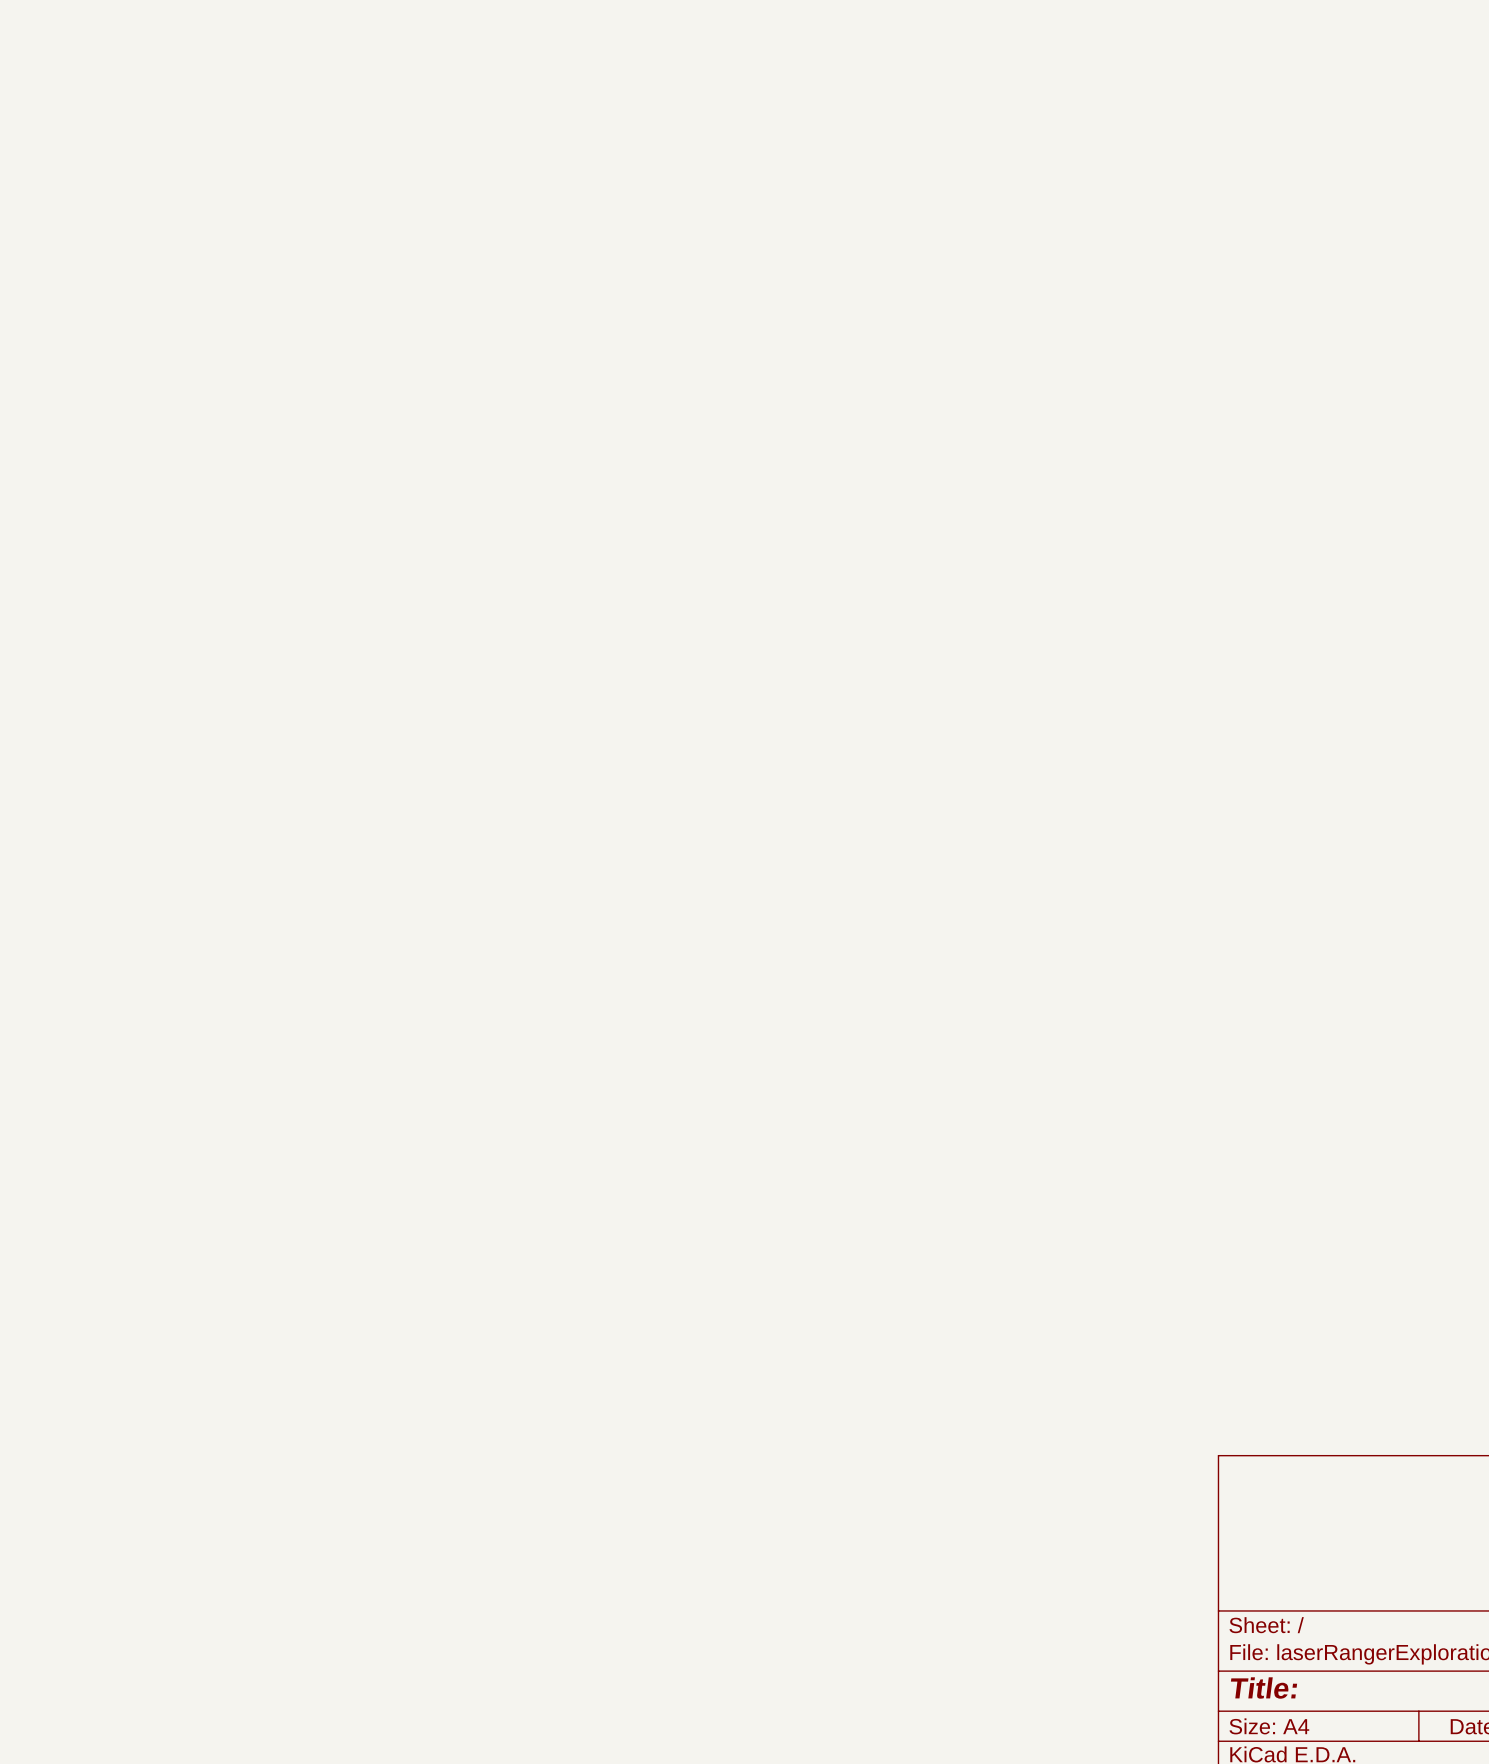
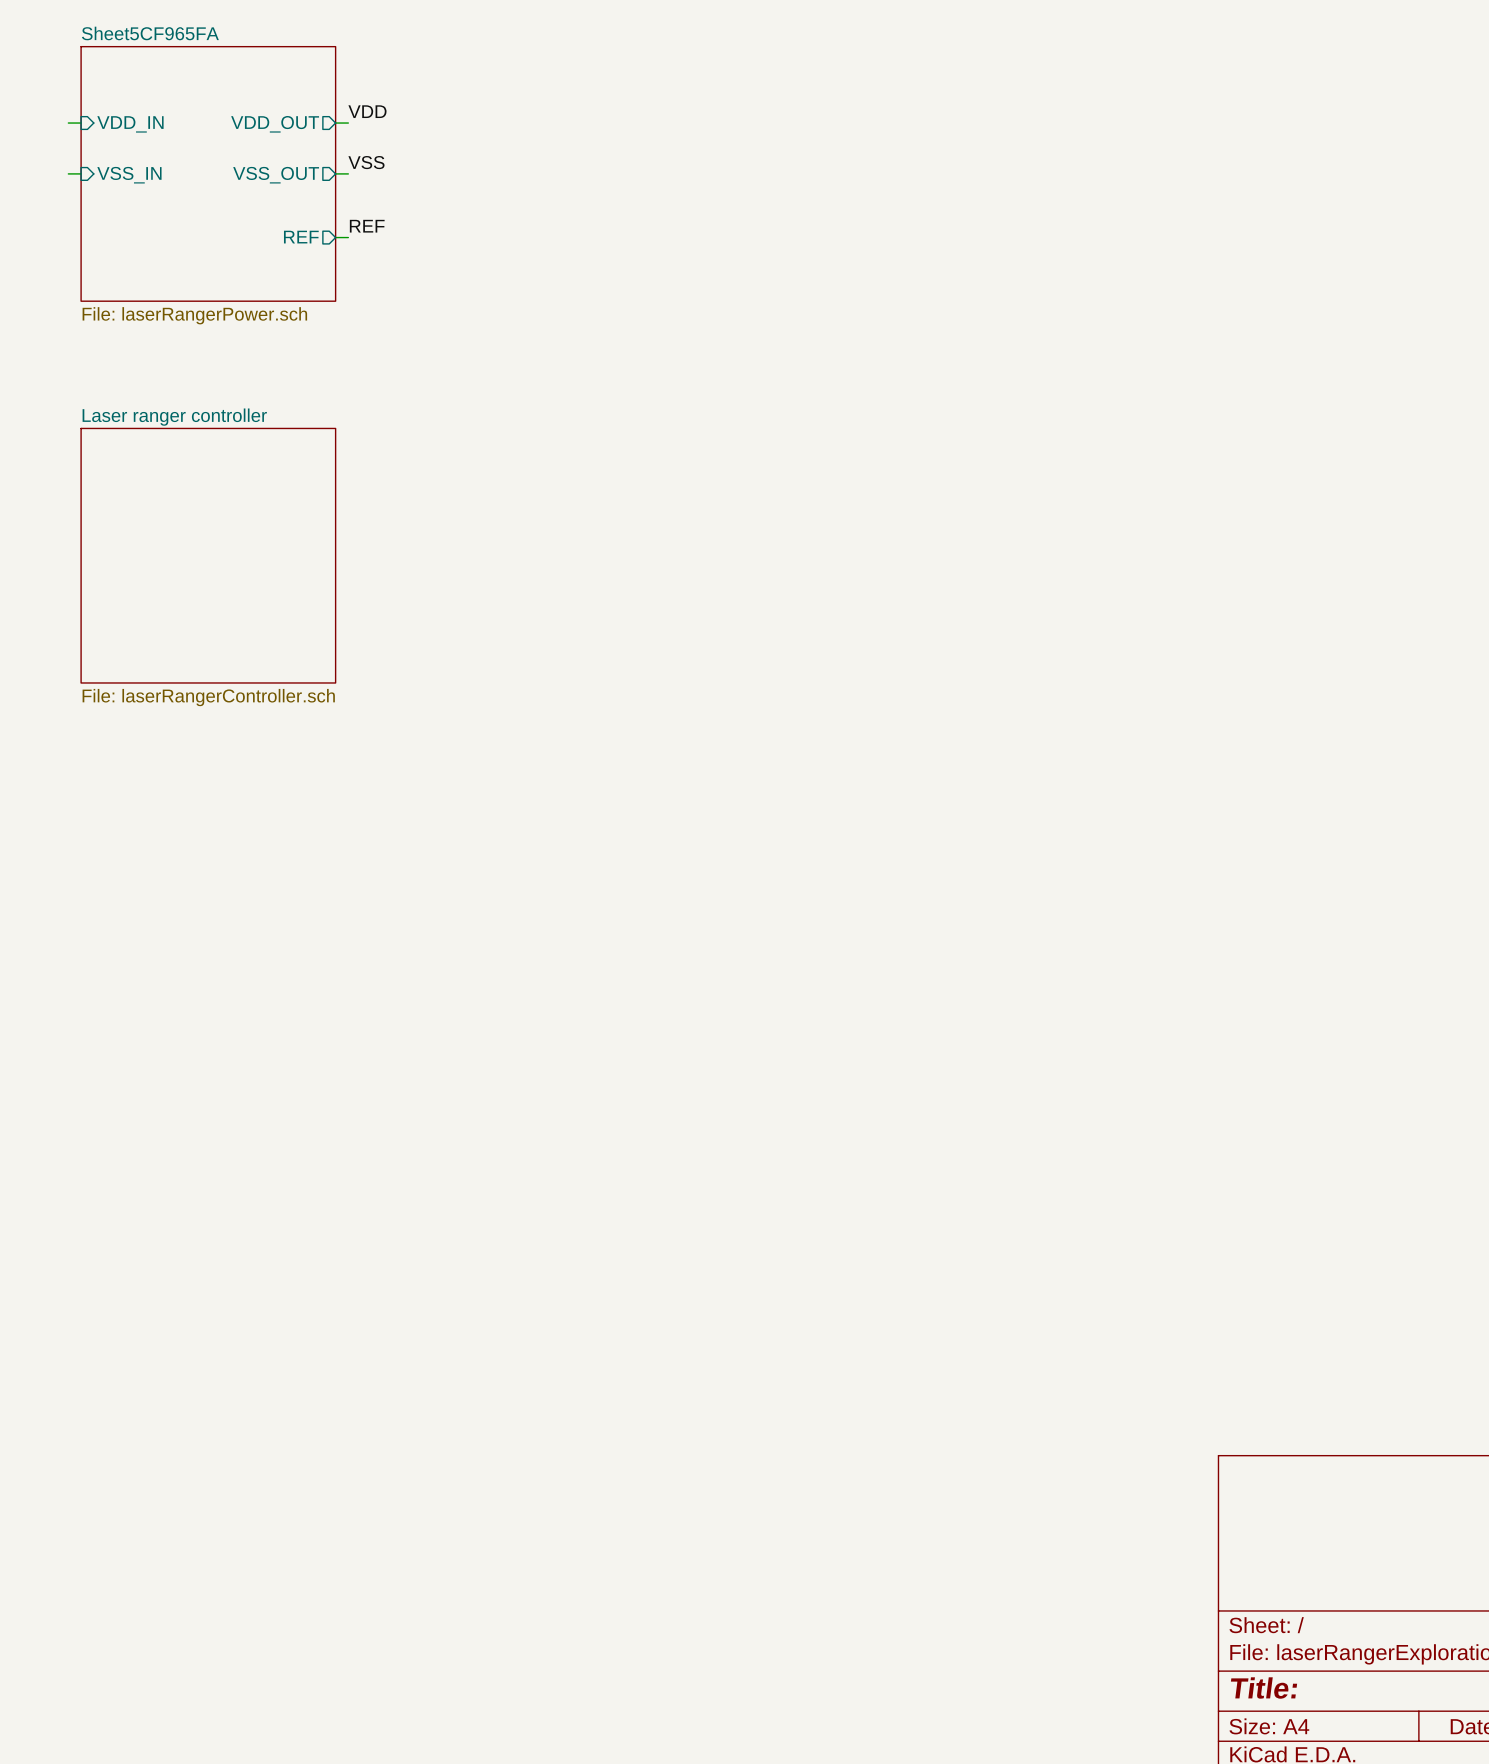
label: none -> VDD (367, 111)
wire: none -> (68, 123) (81, 123)
wire: none -> (335, 123) (348, 123)
sheet pin: none -> VDD_IN (130, 124)
sheet pin: none -> VDD_OUT (275, 124)
label: none -> VSS (366, 162)
wire: none -> (68, 173) (81, 173)
sheet Sheet5CF965FA: none -> File: laserRangerPower.sch (208, 173)
wire: none -> (335, 173) (348, 173)
sheet pin: none -> VSS_IN (129, 175)
sheet pin: none -> VSS_OUT (276, 175)
label: none -> REF (367, 226)
sheet pin: none -> REF (301, 237)
wire: none -> (335, 237) (348, 237)
sheet Laser ranger controller: none -> File: laserRangerController.sch (208, 555)

